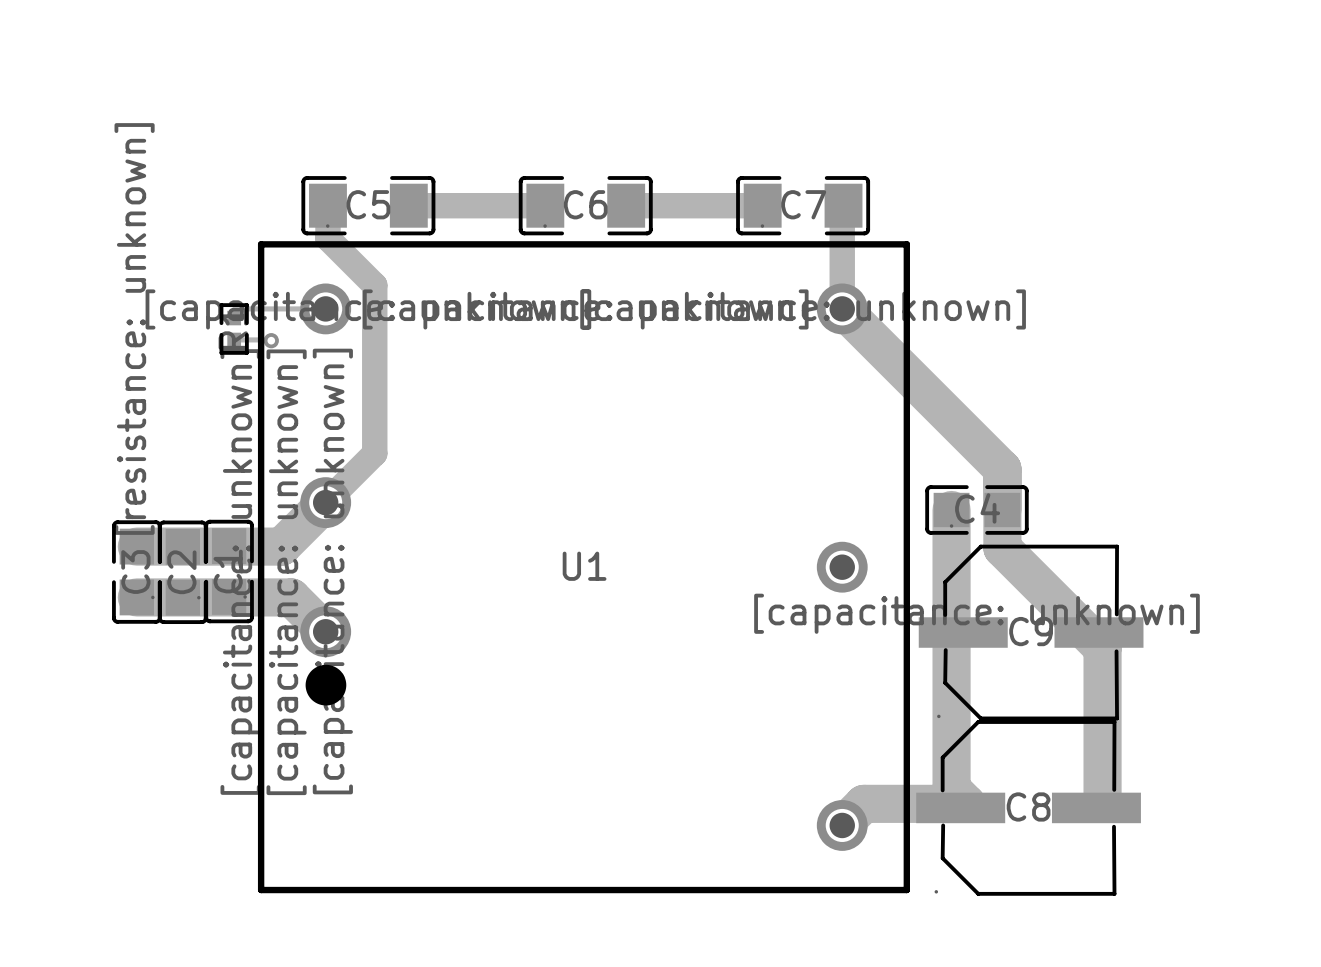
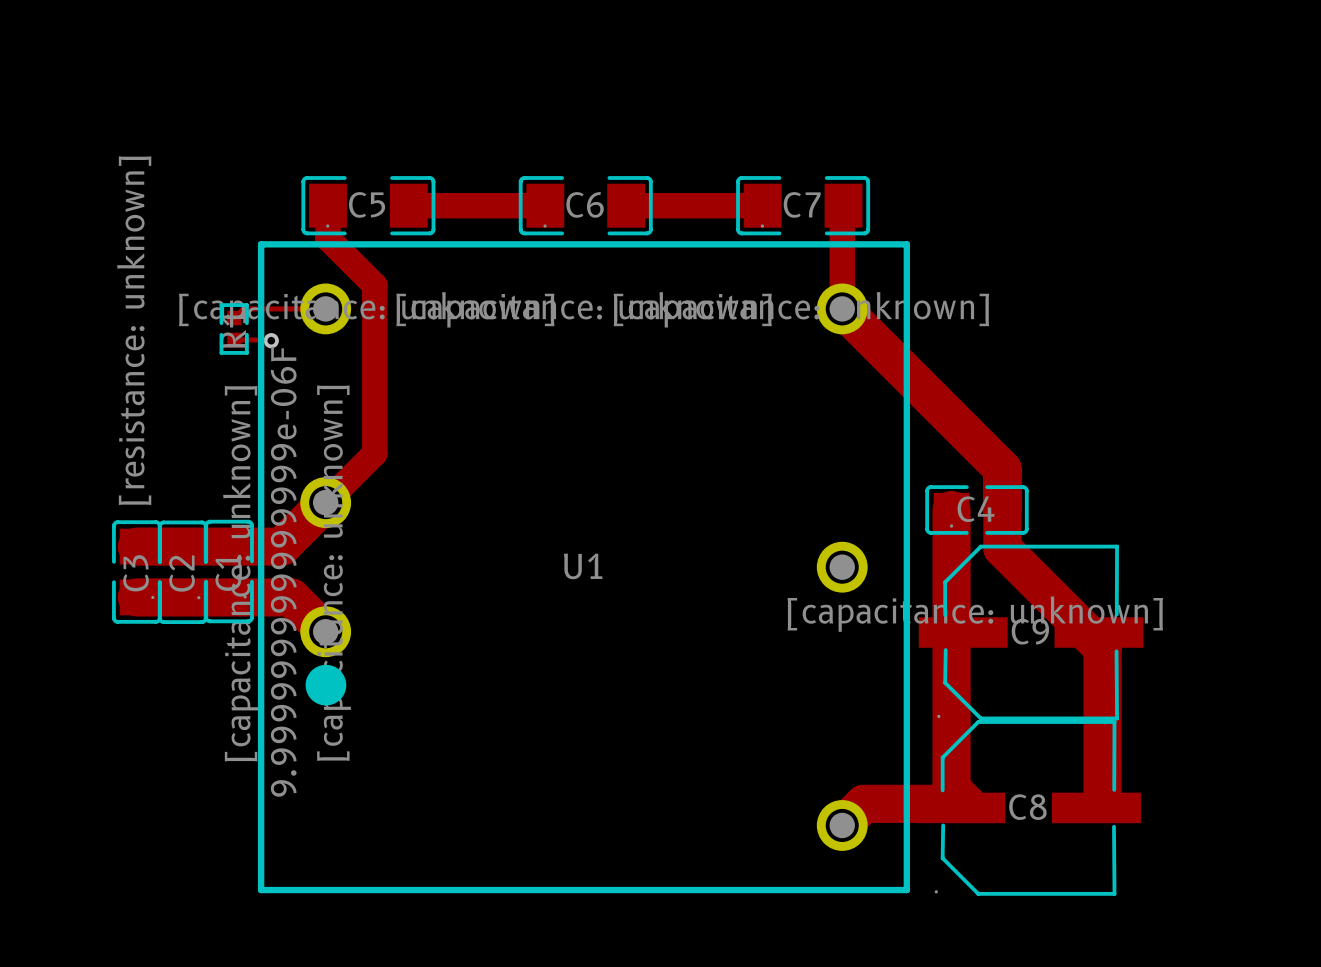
C2 value: [capacitance: unknown] (286, 572) -> 9.999999999999999e-06F (283, 571)

